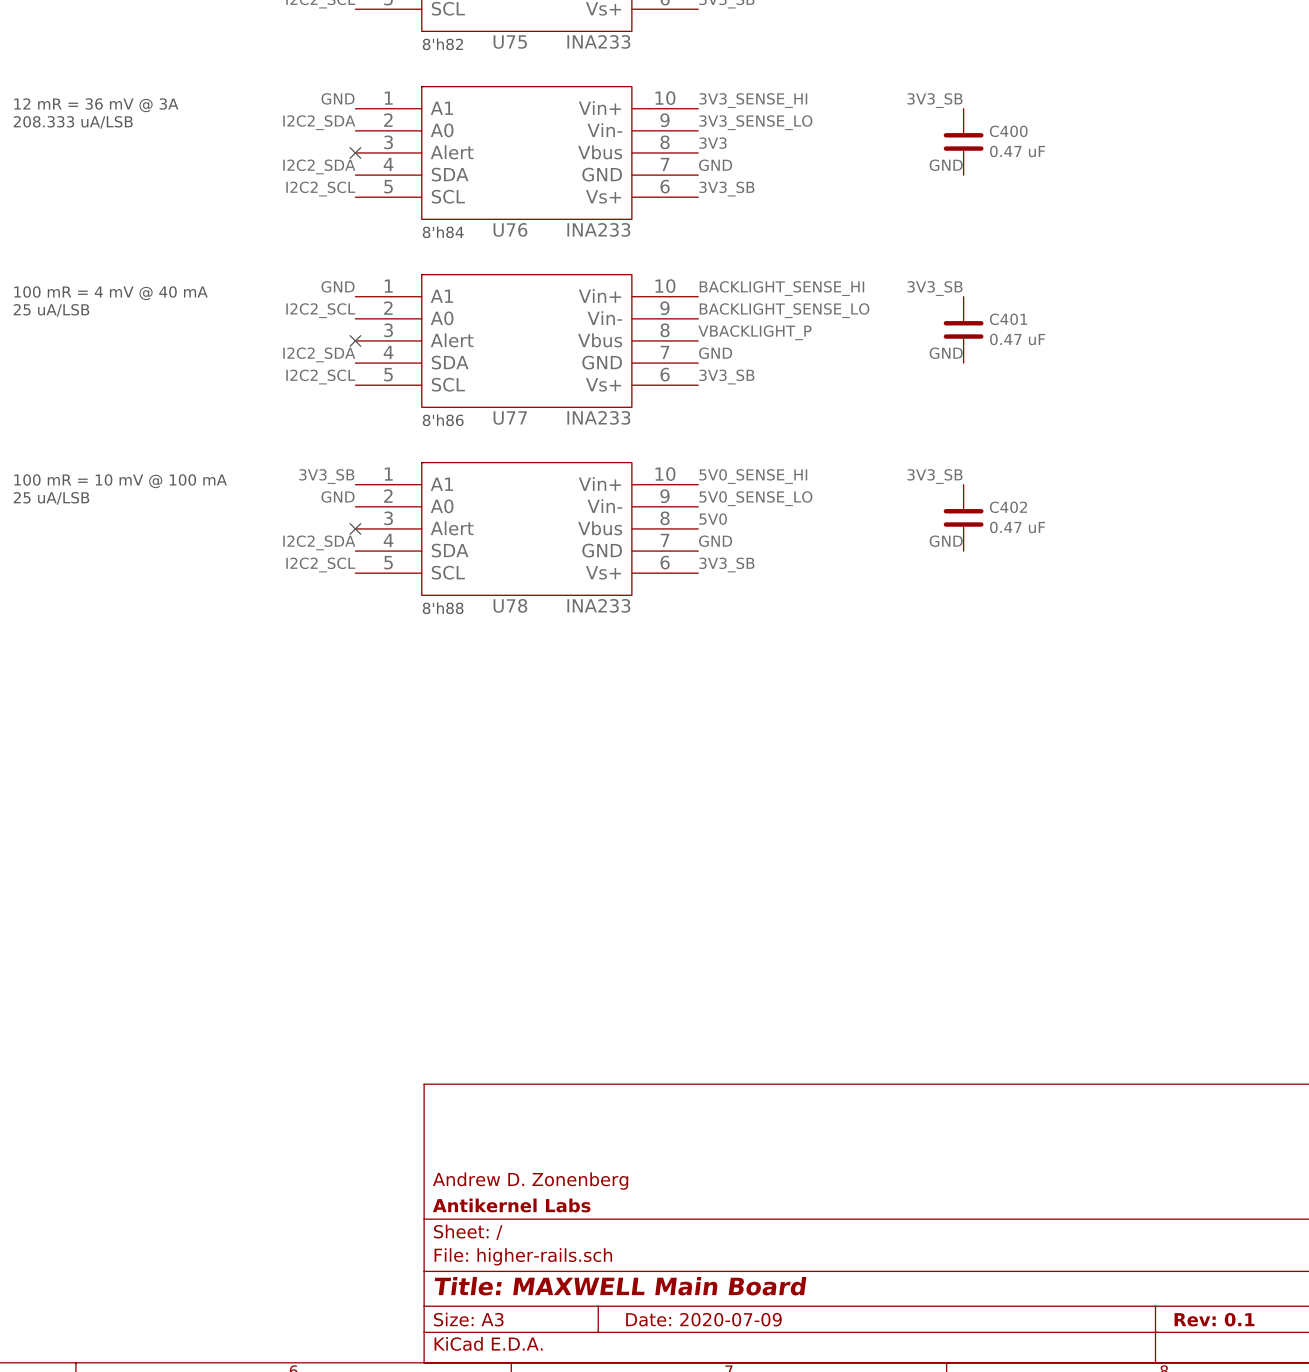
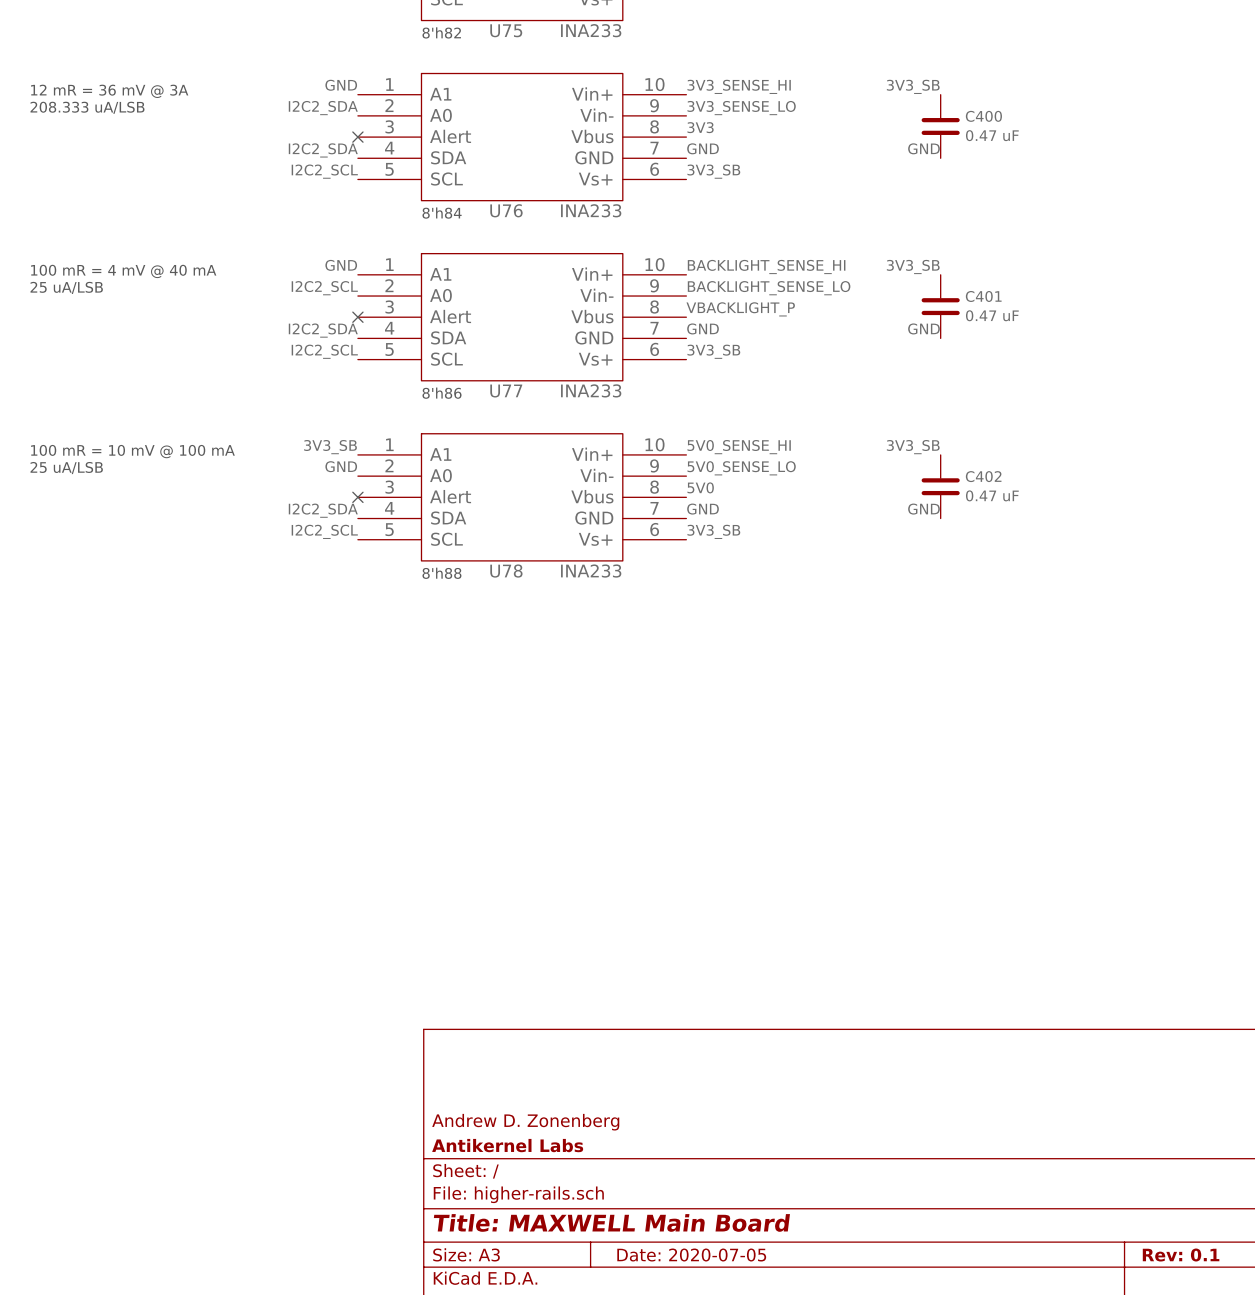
title block: Date: 2020-07-09 (703, 1319) -> Date: 2020-07-05 (691, 1255)

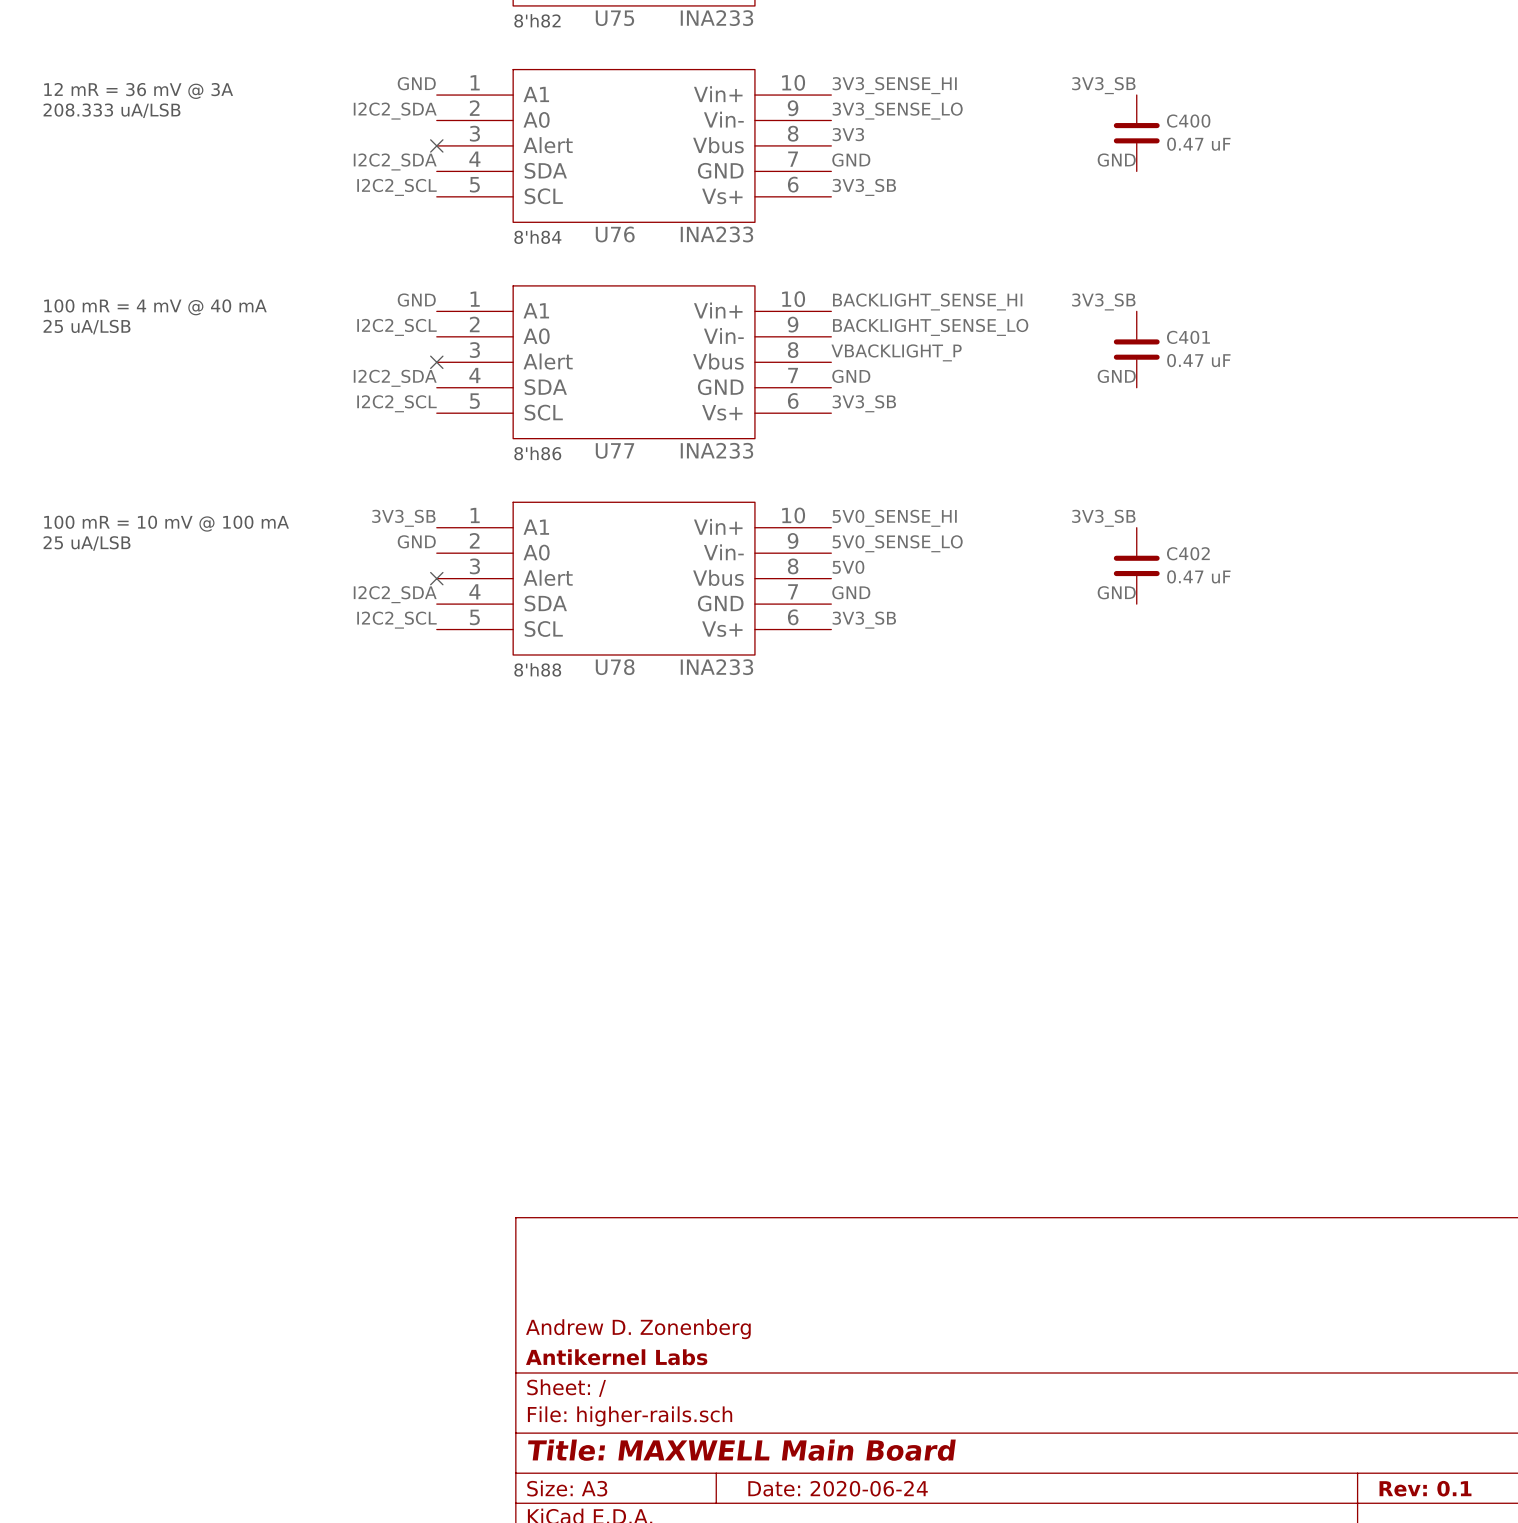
title block: Date: 2020-07-05 (691, 1255) -> Date: 2020-06-24 (838, 1488)

